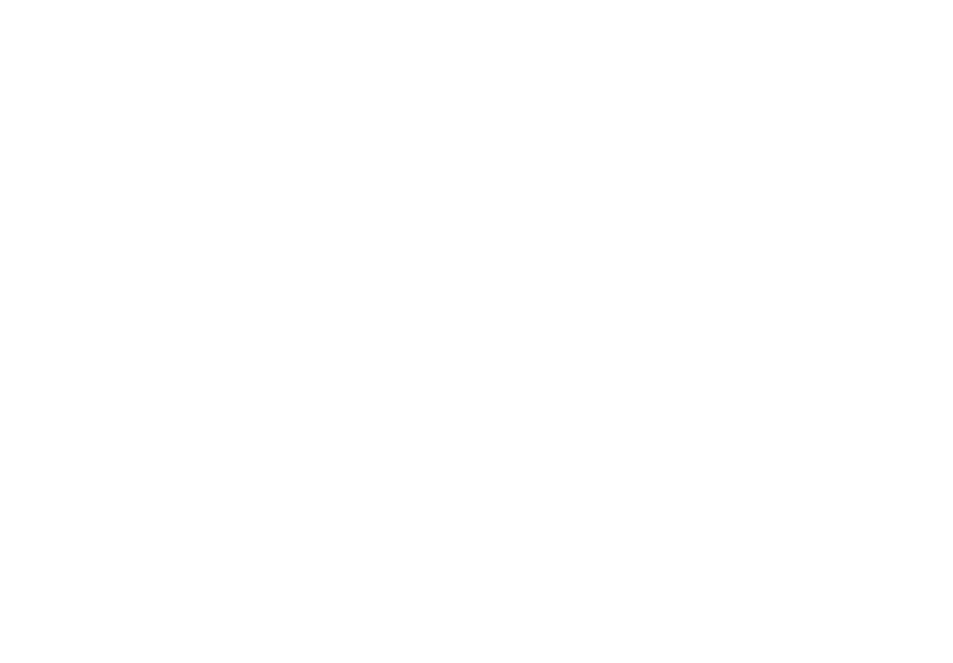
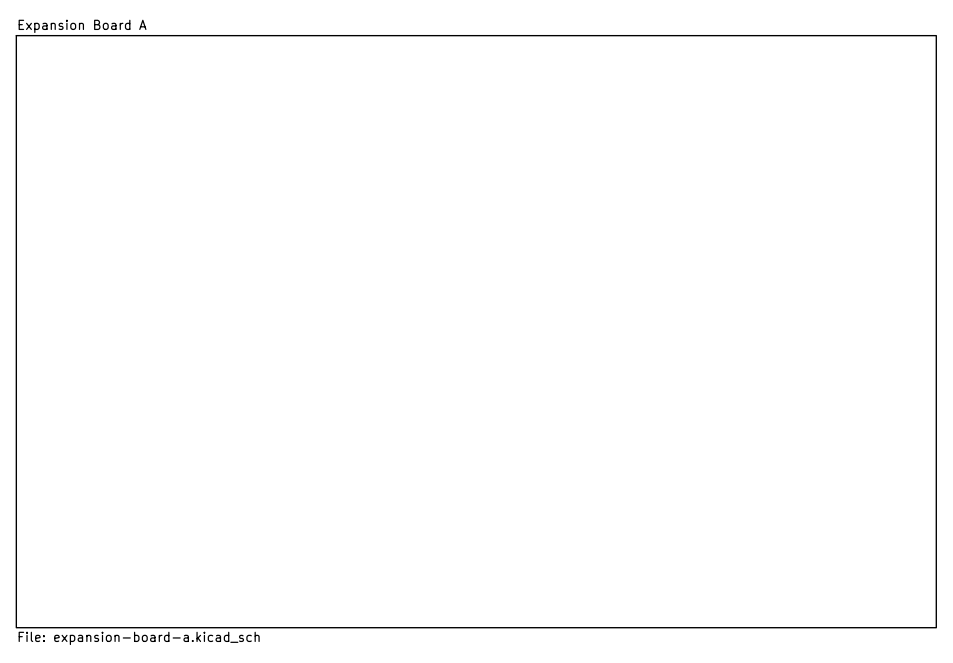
sheet Expansion Board A: none -> File: expansion-board-a.kicad_sch (476, 331)

